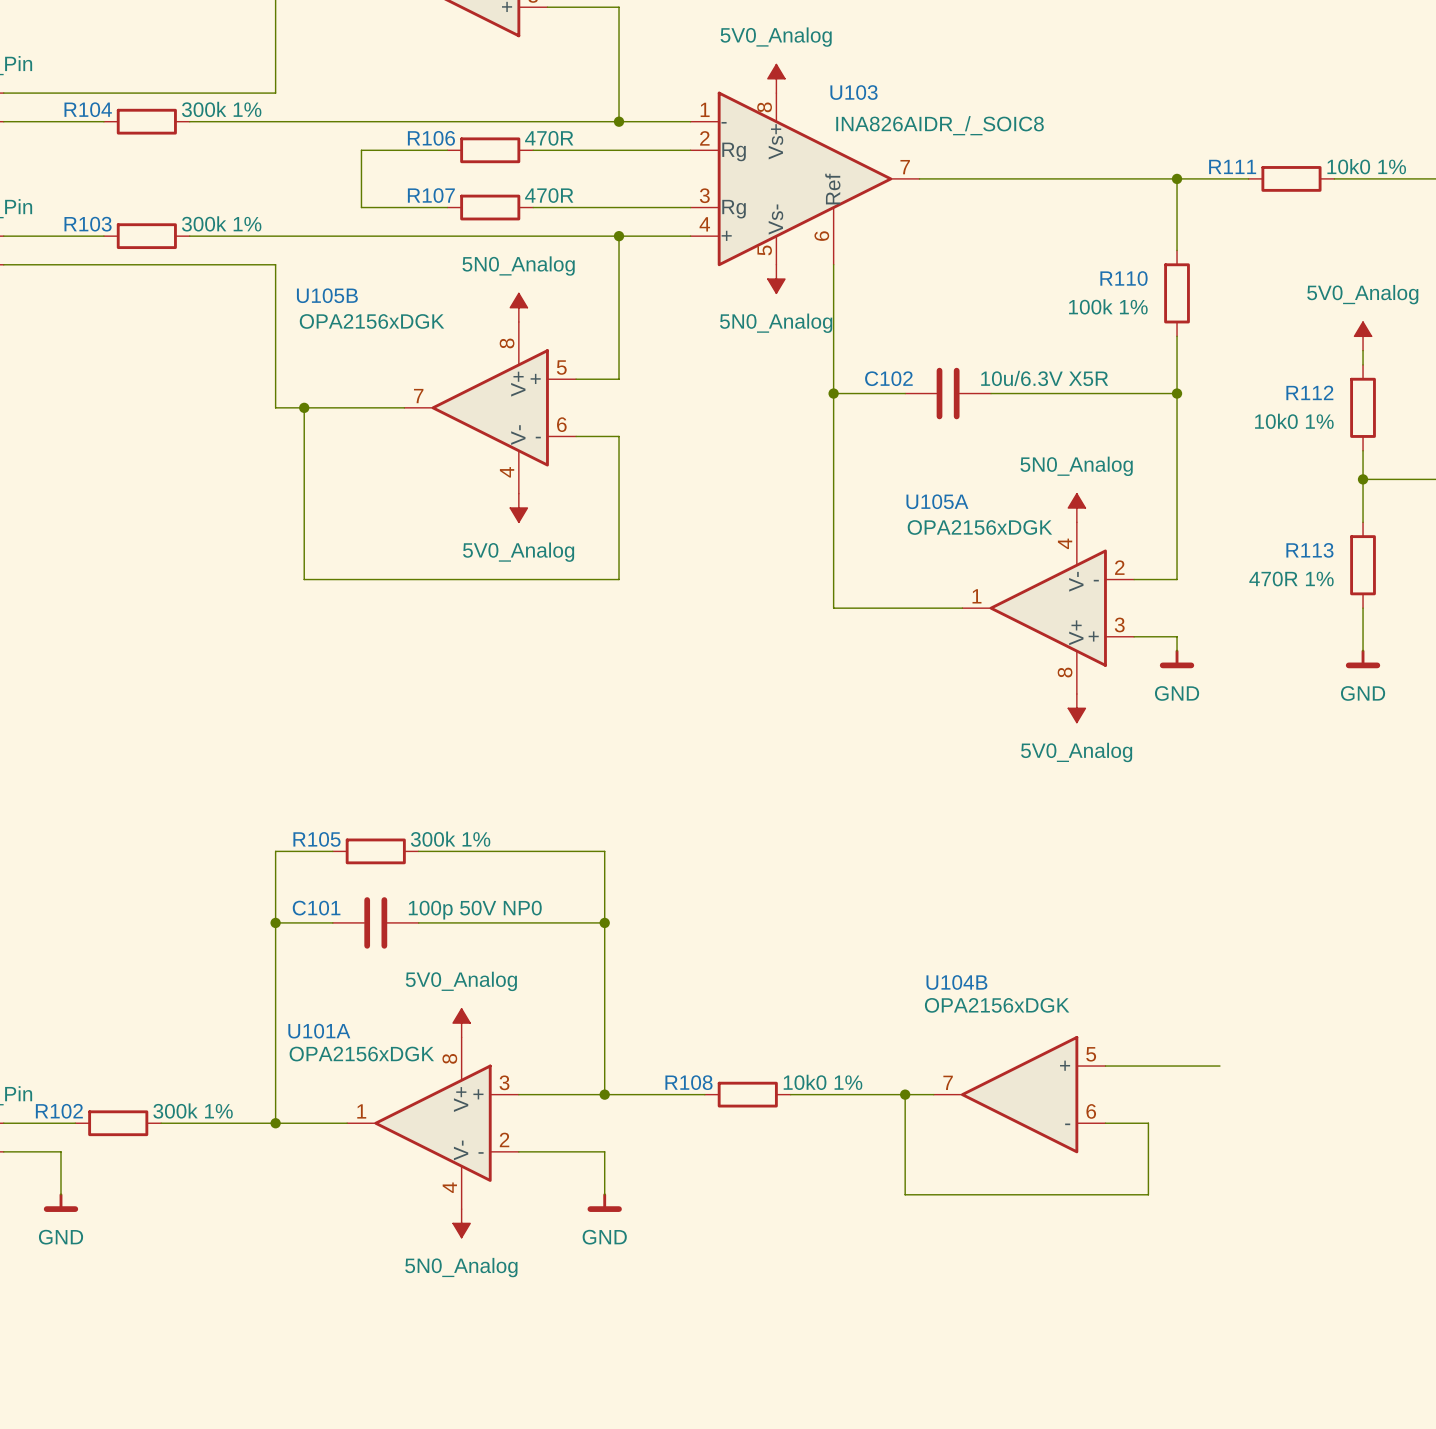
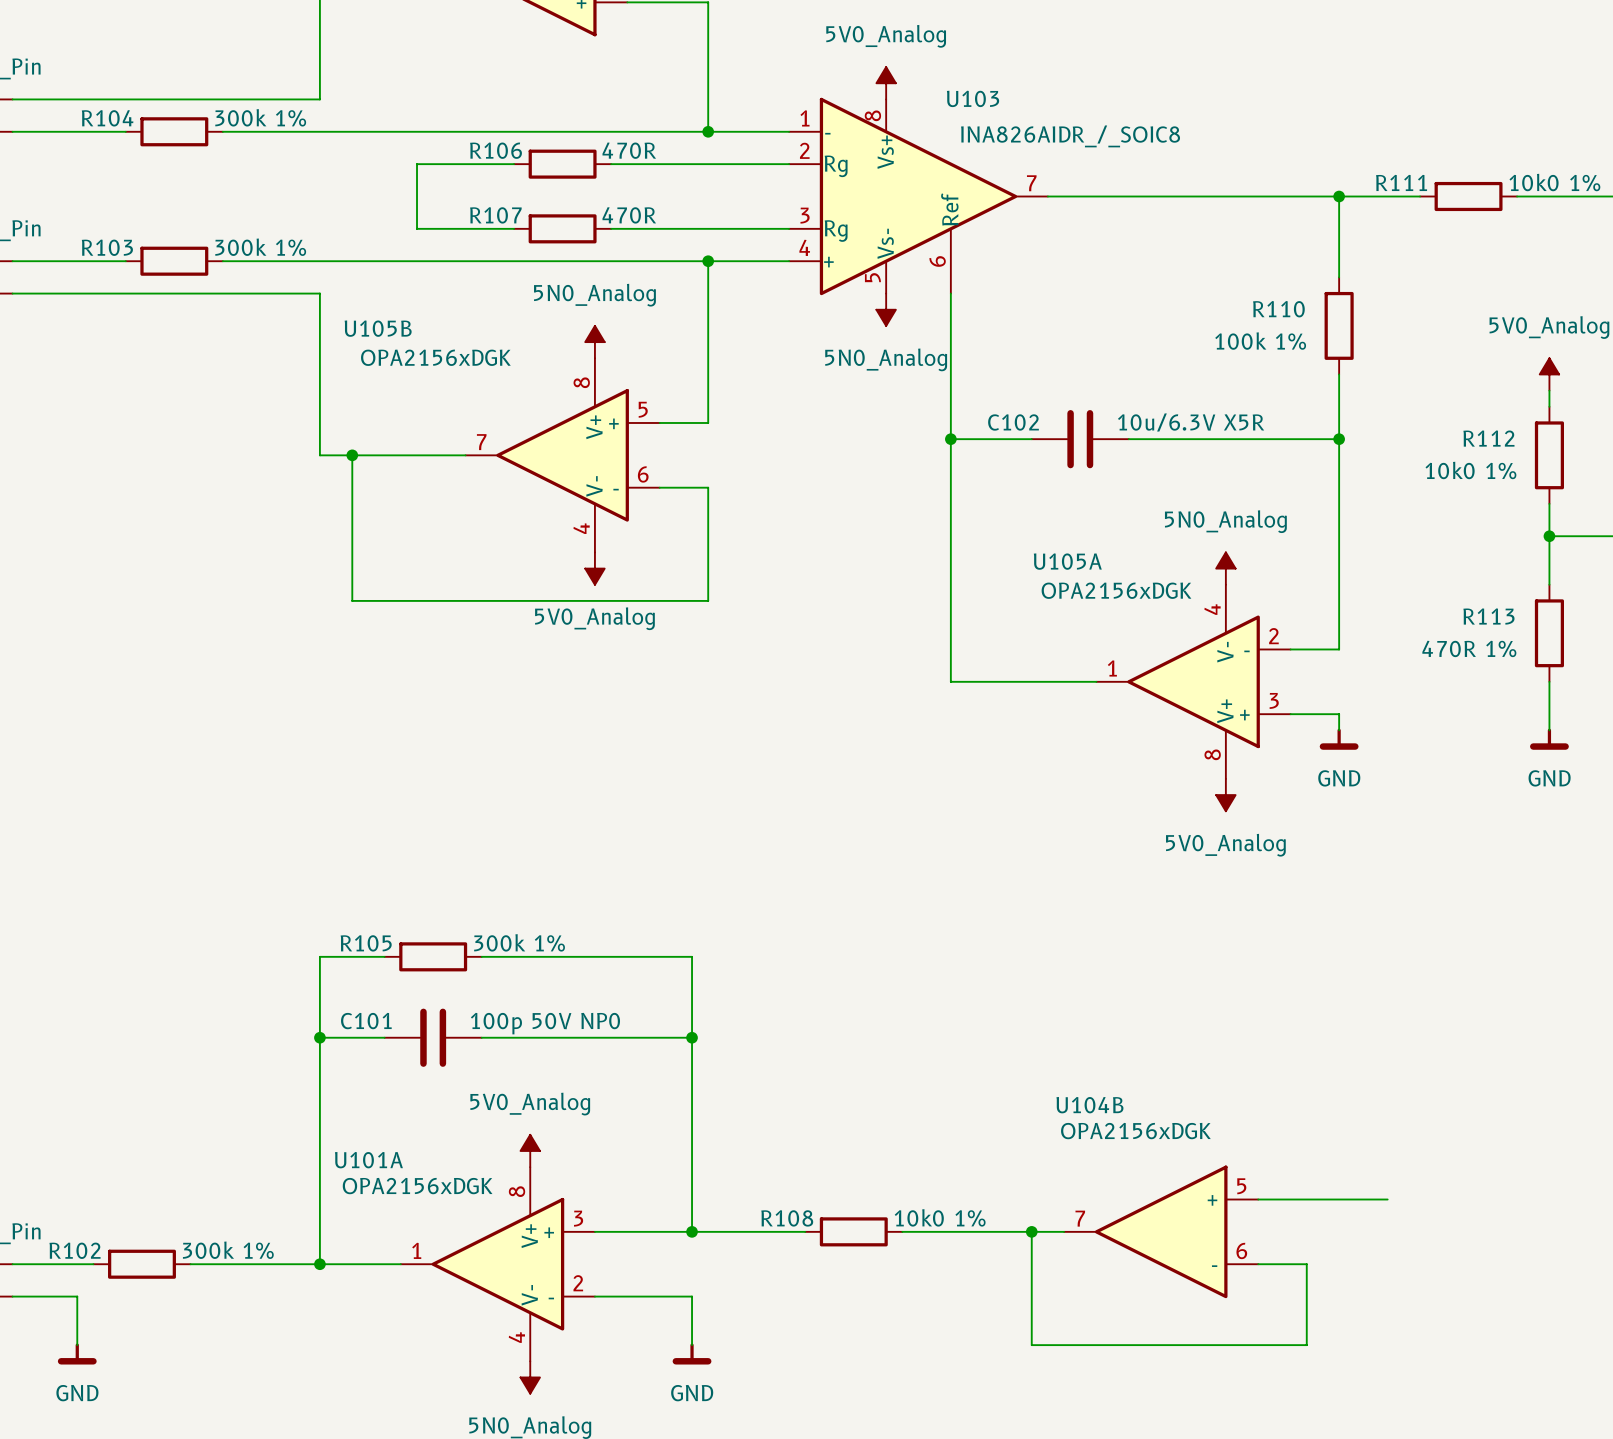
wire: (304, 536) (304, 579) (619, 579) (619, 536) -> (352, 600) (708, 600)

